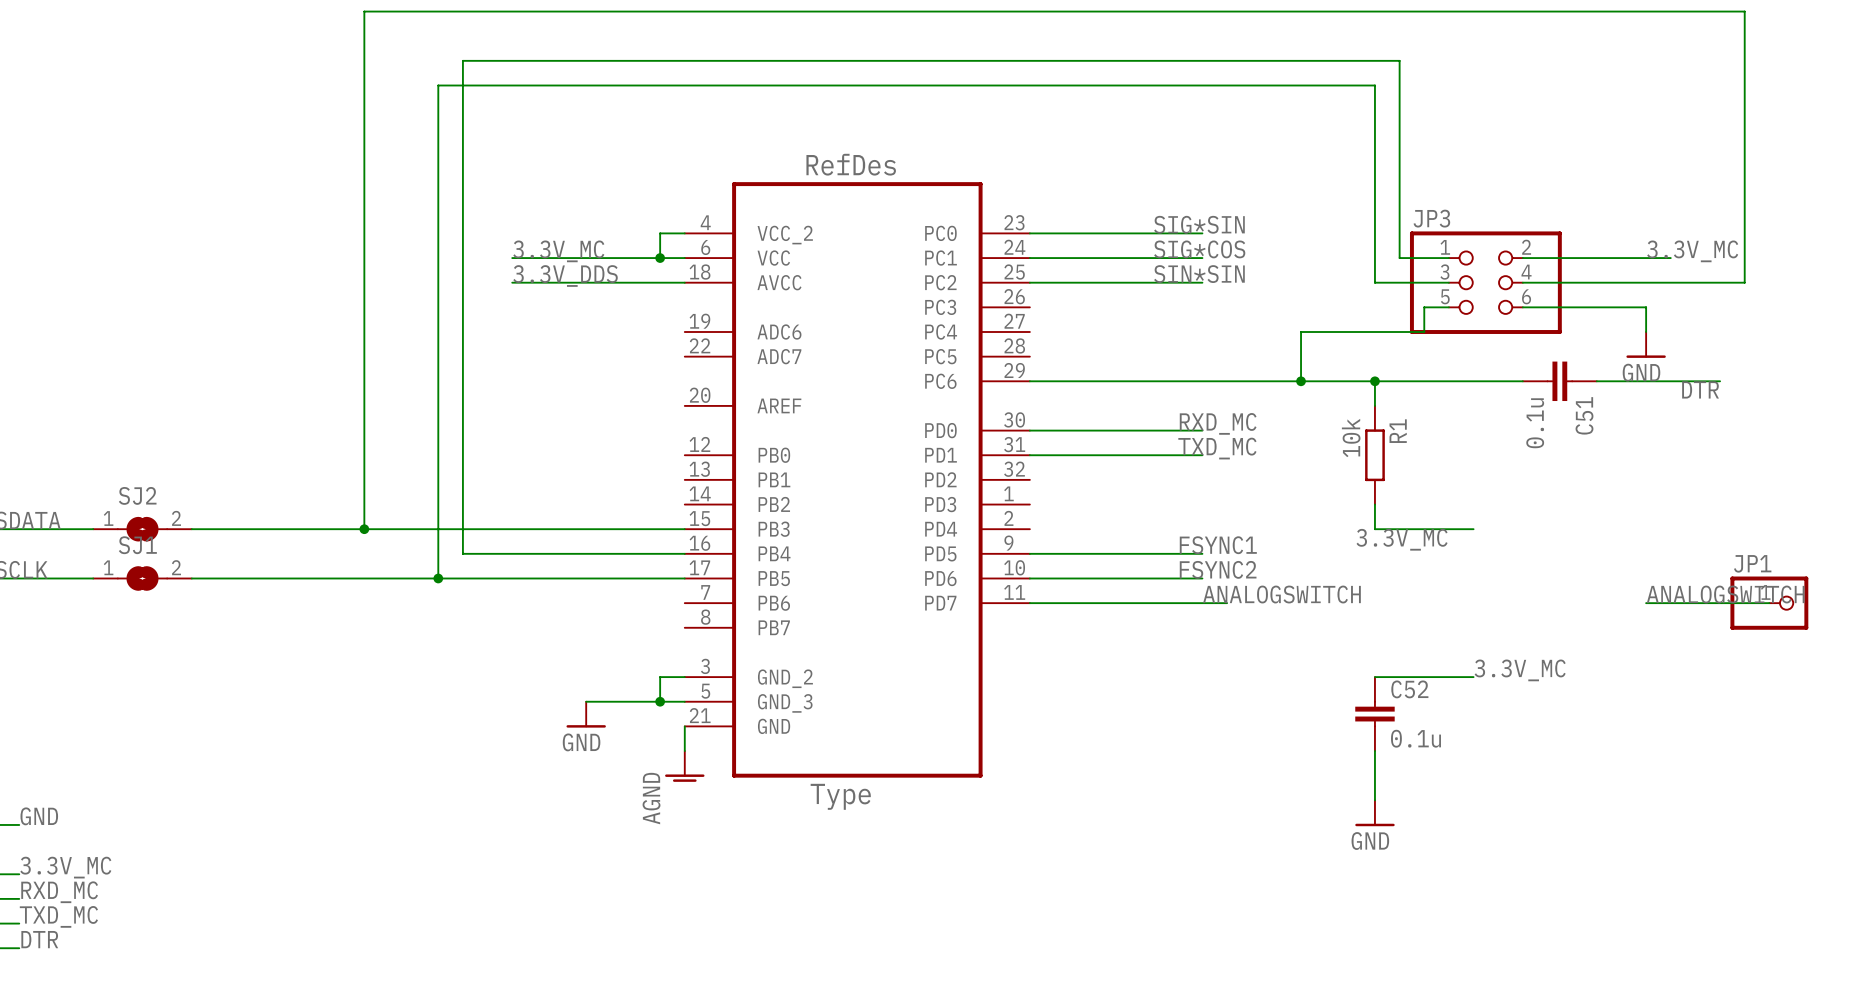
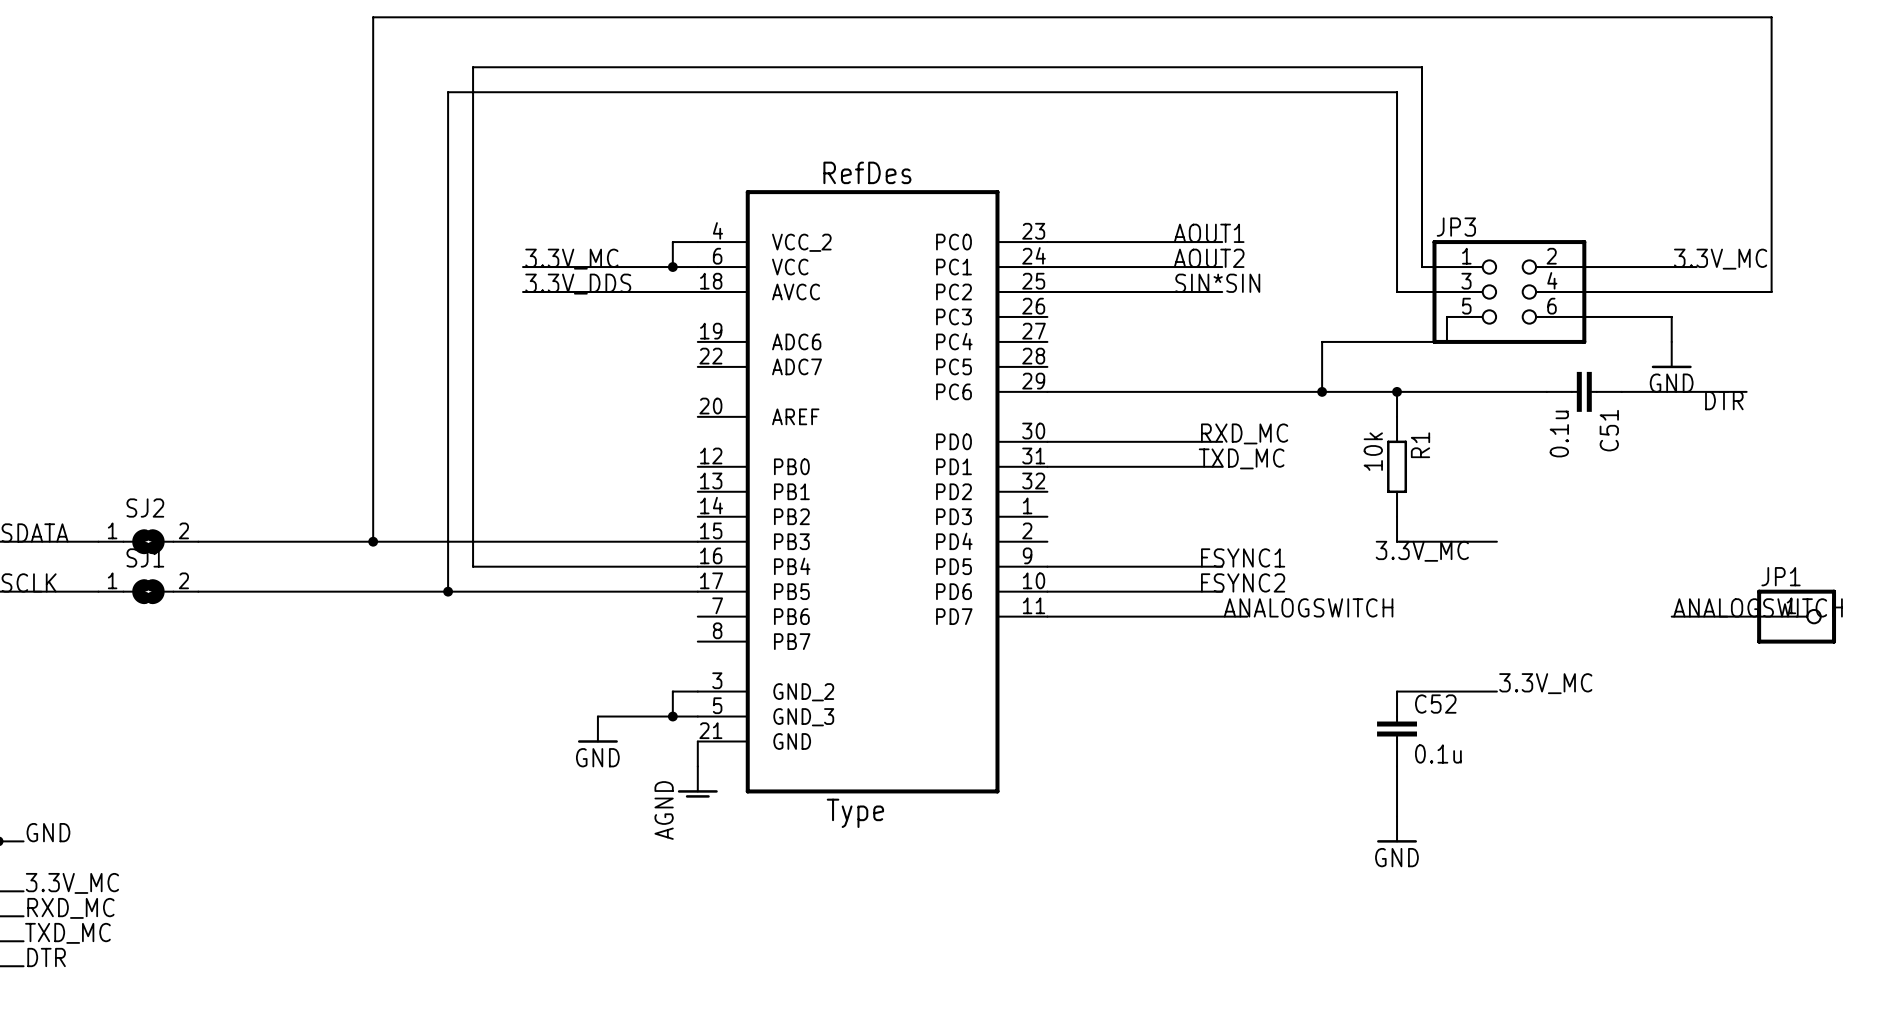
label: SIG*SIN (1199, 224) -> AOUT1 (1209, 233)
label: SIG*COS (1199, 249) -> AOUT2 (1209, 258)

